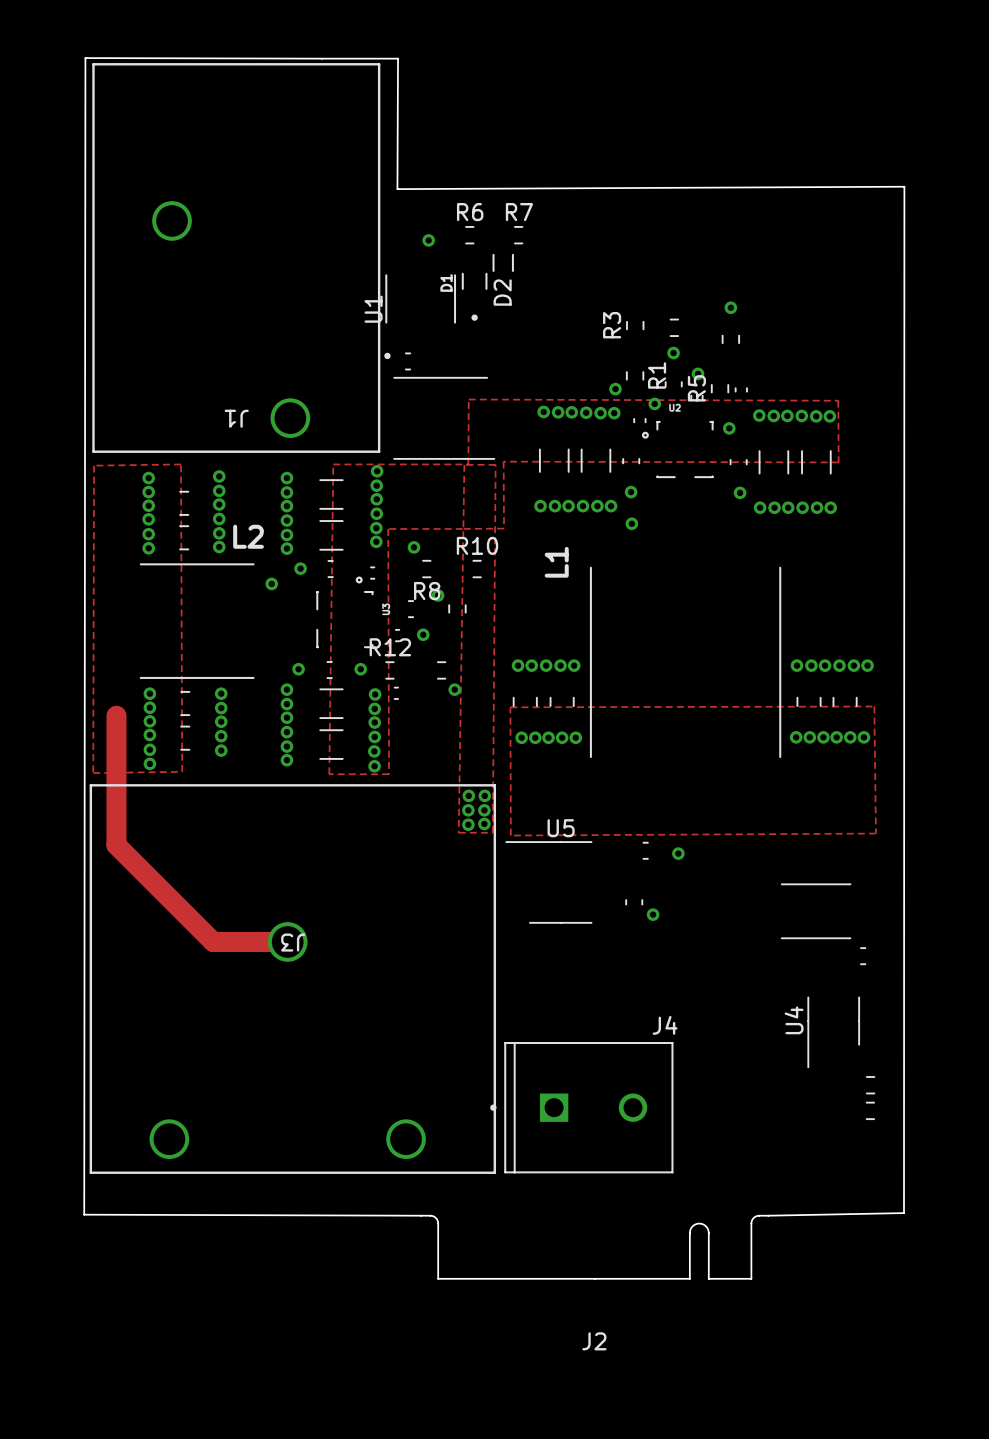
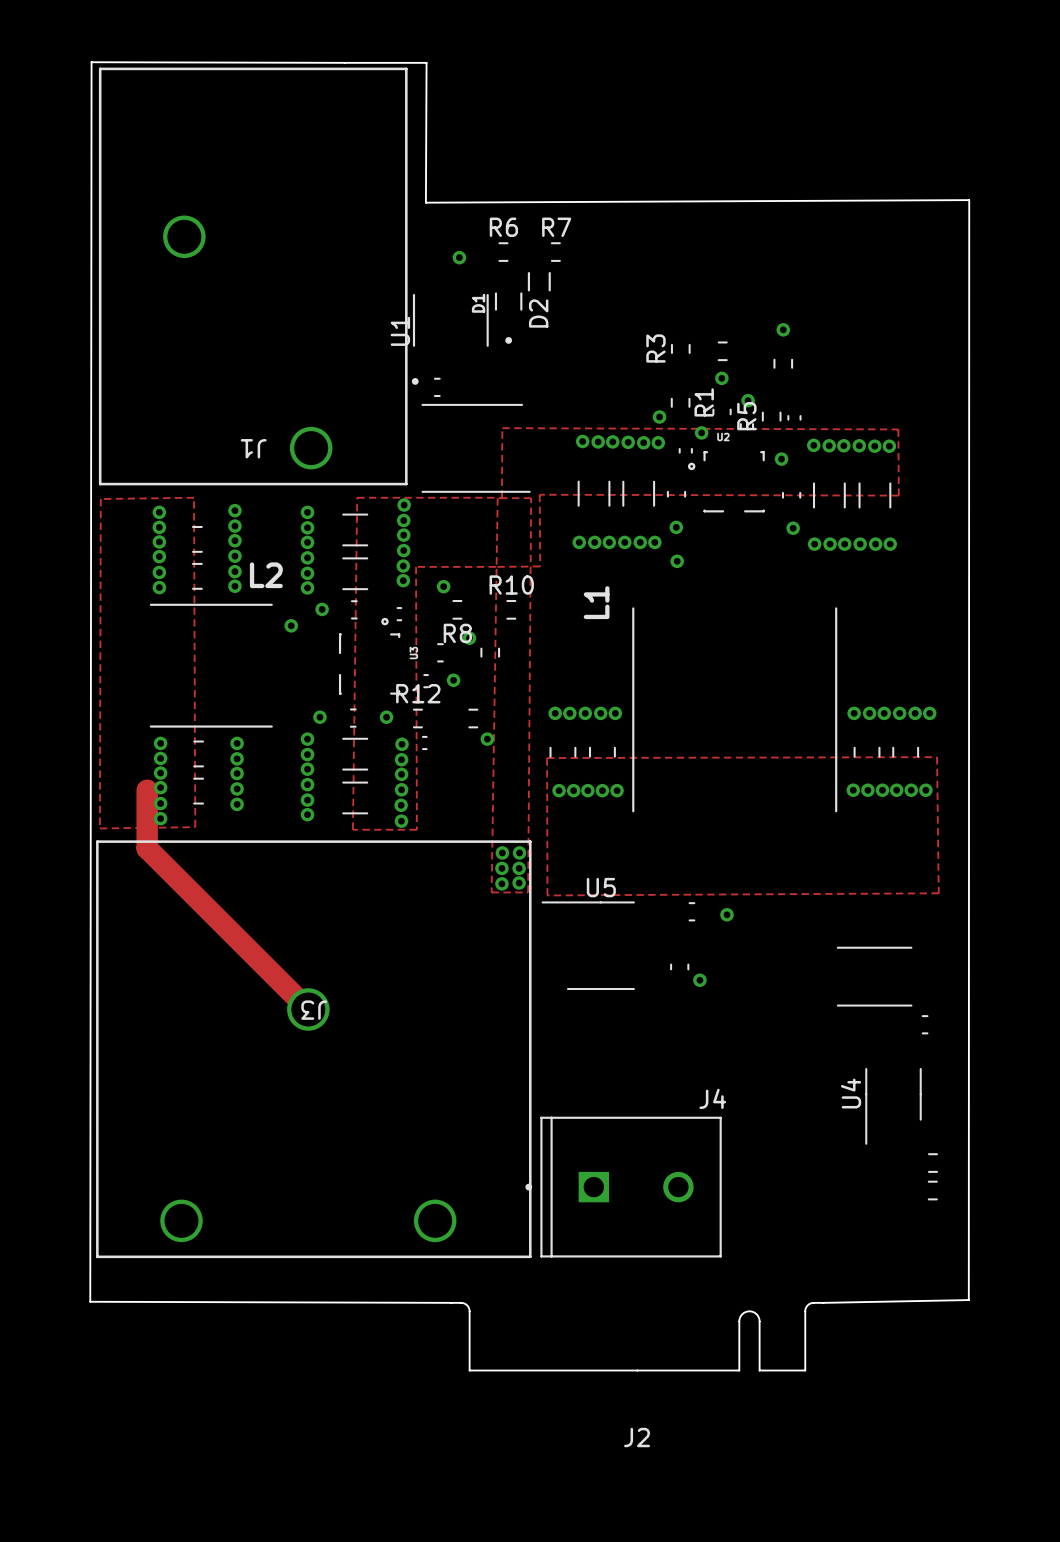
track: (116, 715) (116, 845) (213, 941) (287, 941) -> (147, 790) (147, 848) (308, 1009)

